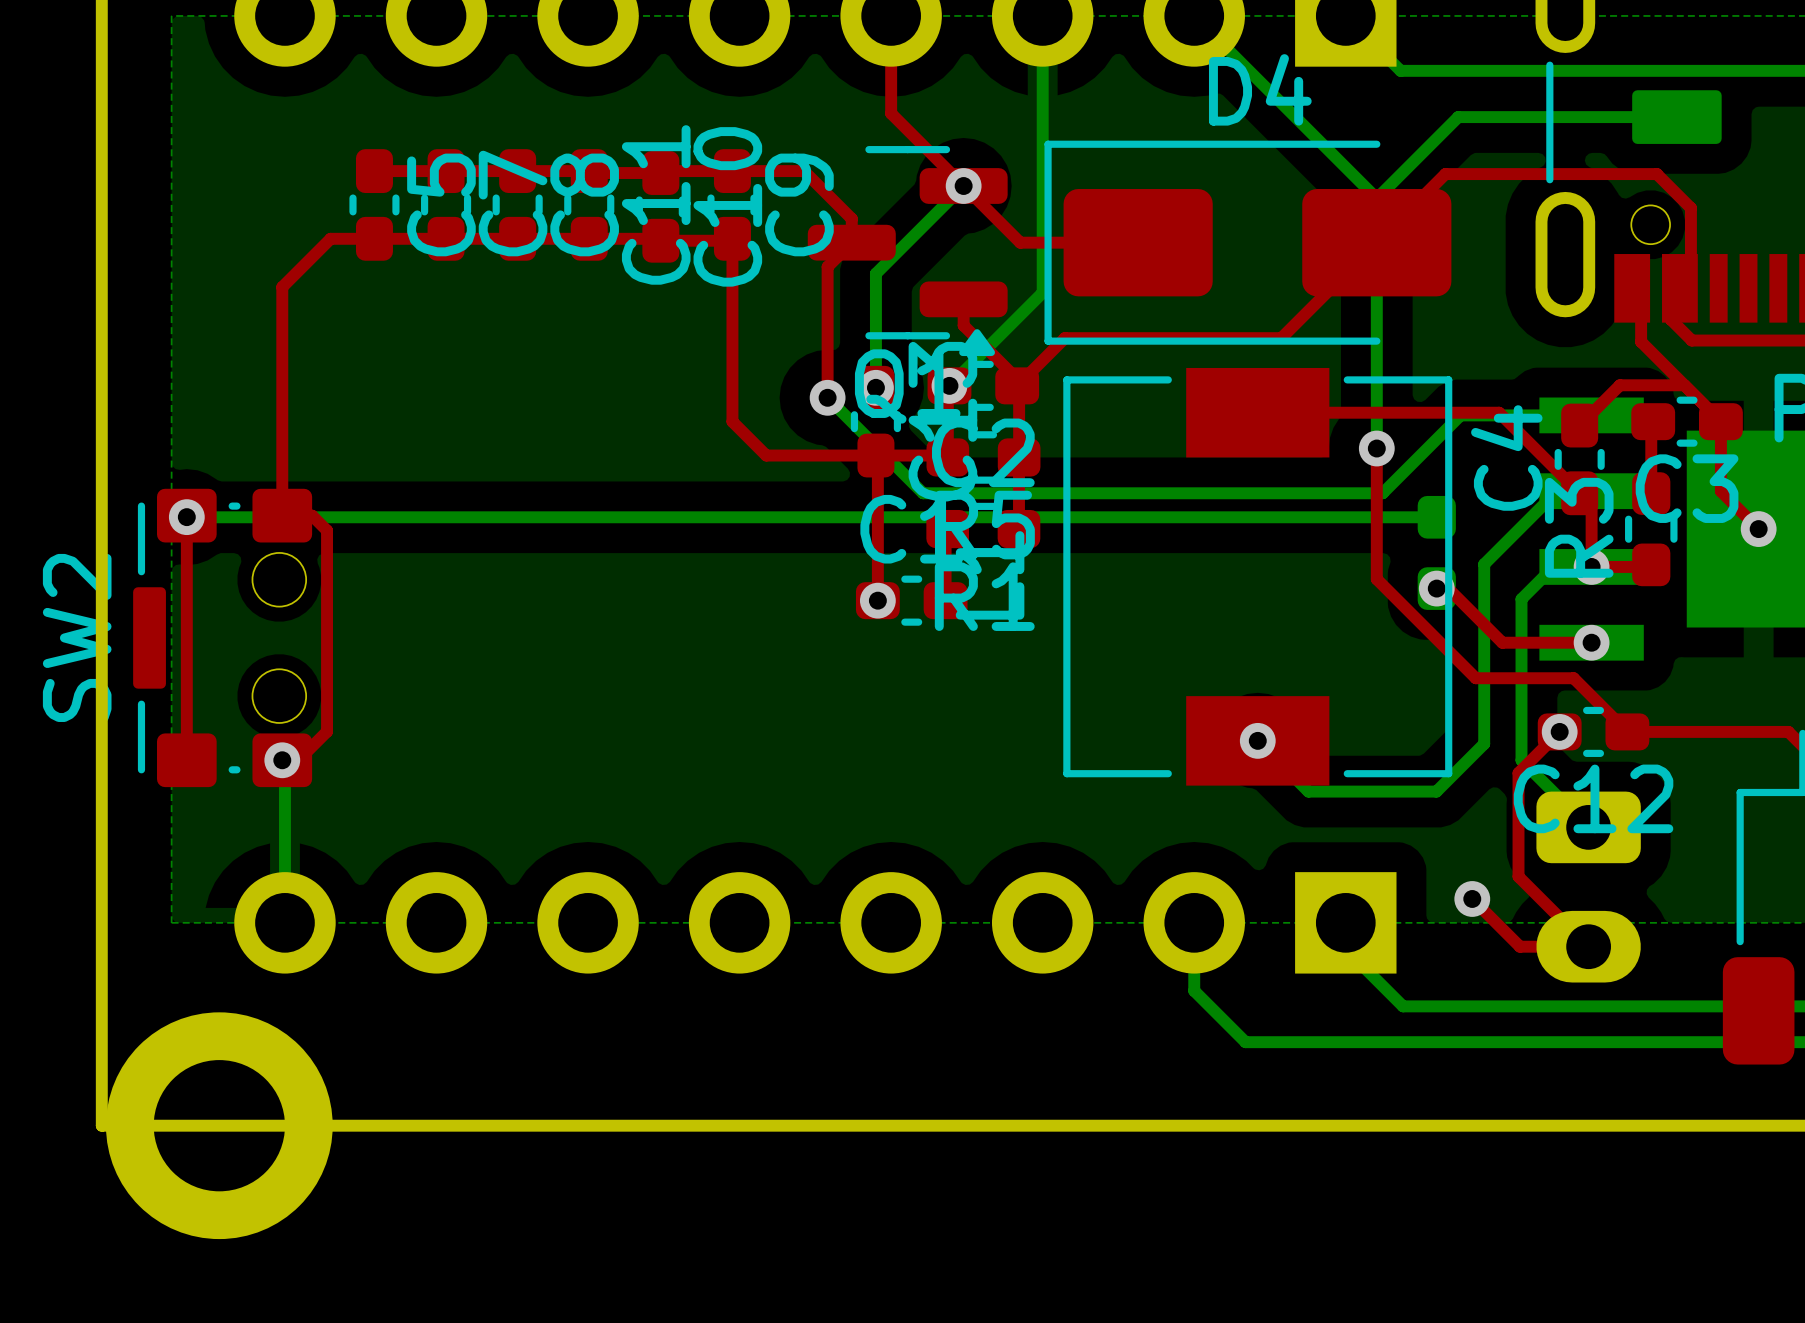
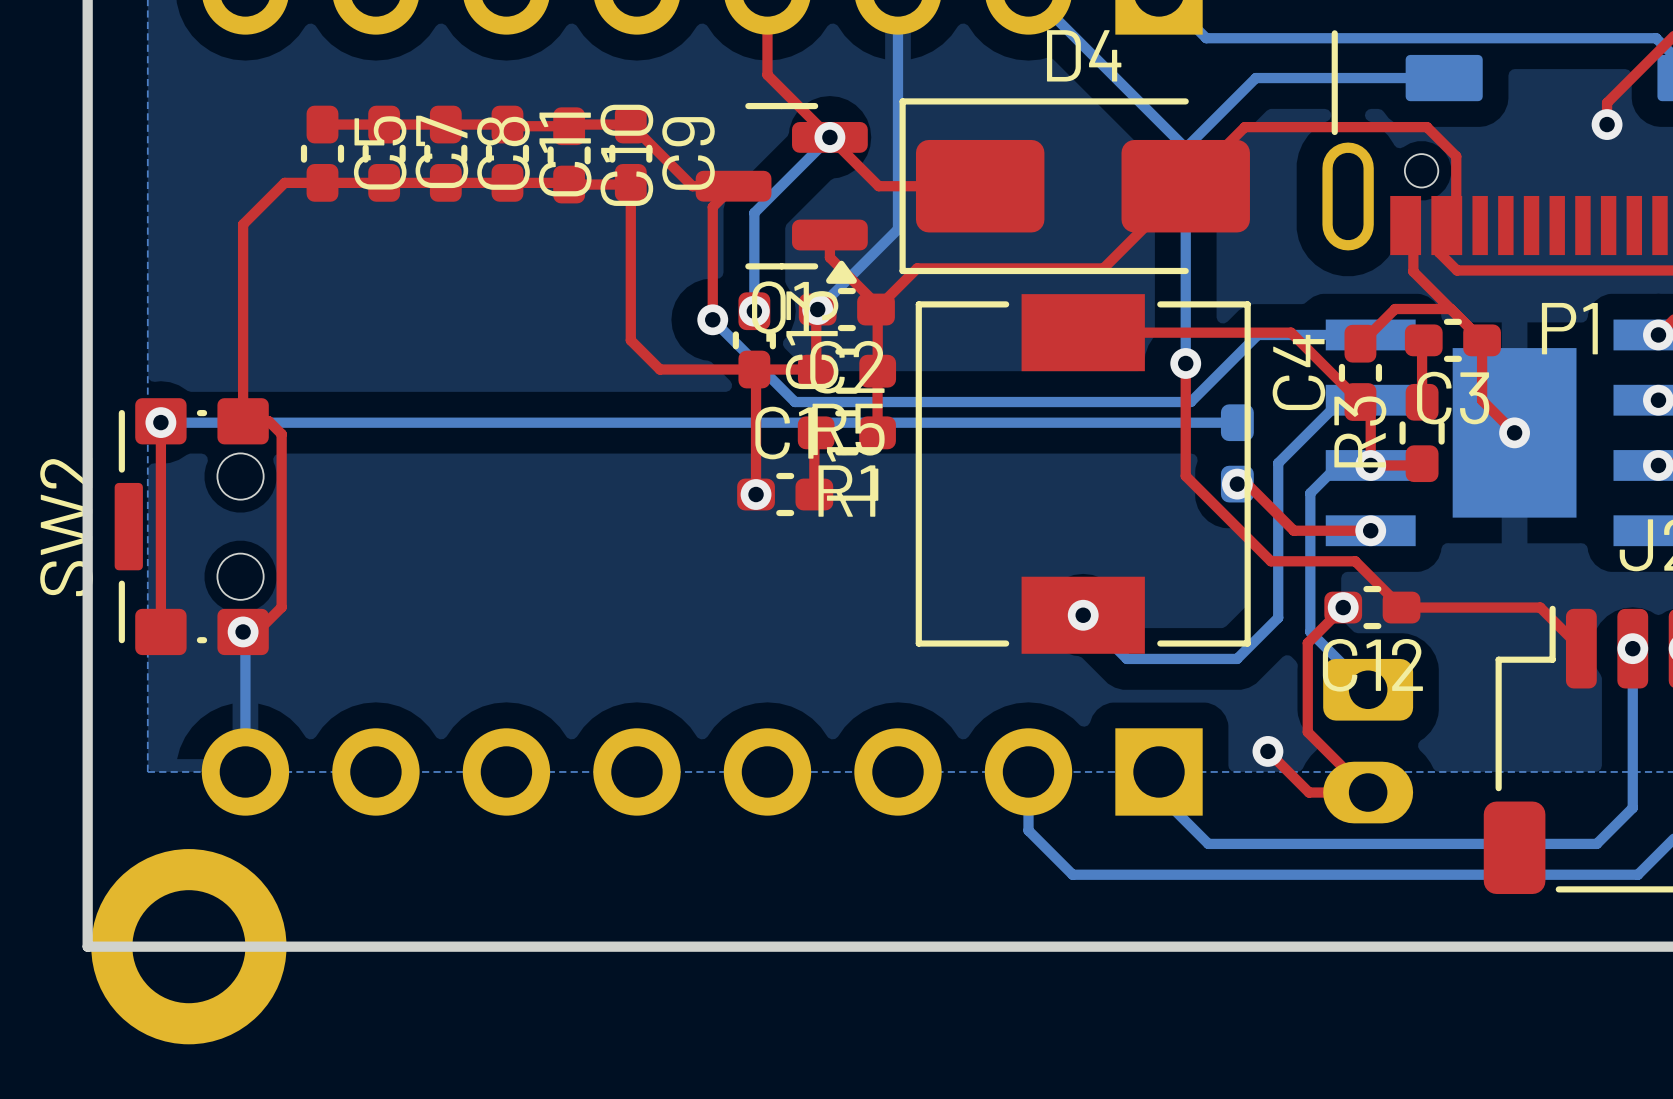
top track: (732, 171) (804, 171) (851, 218) (851, 242) -> (630, 124) (692, 186) (733, 186)

